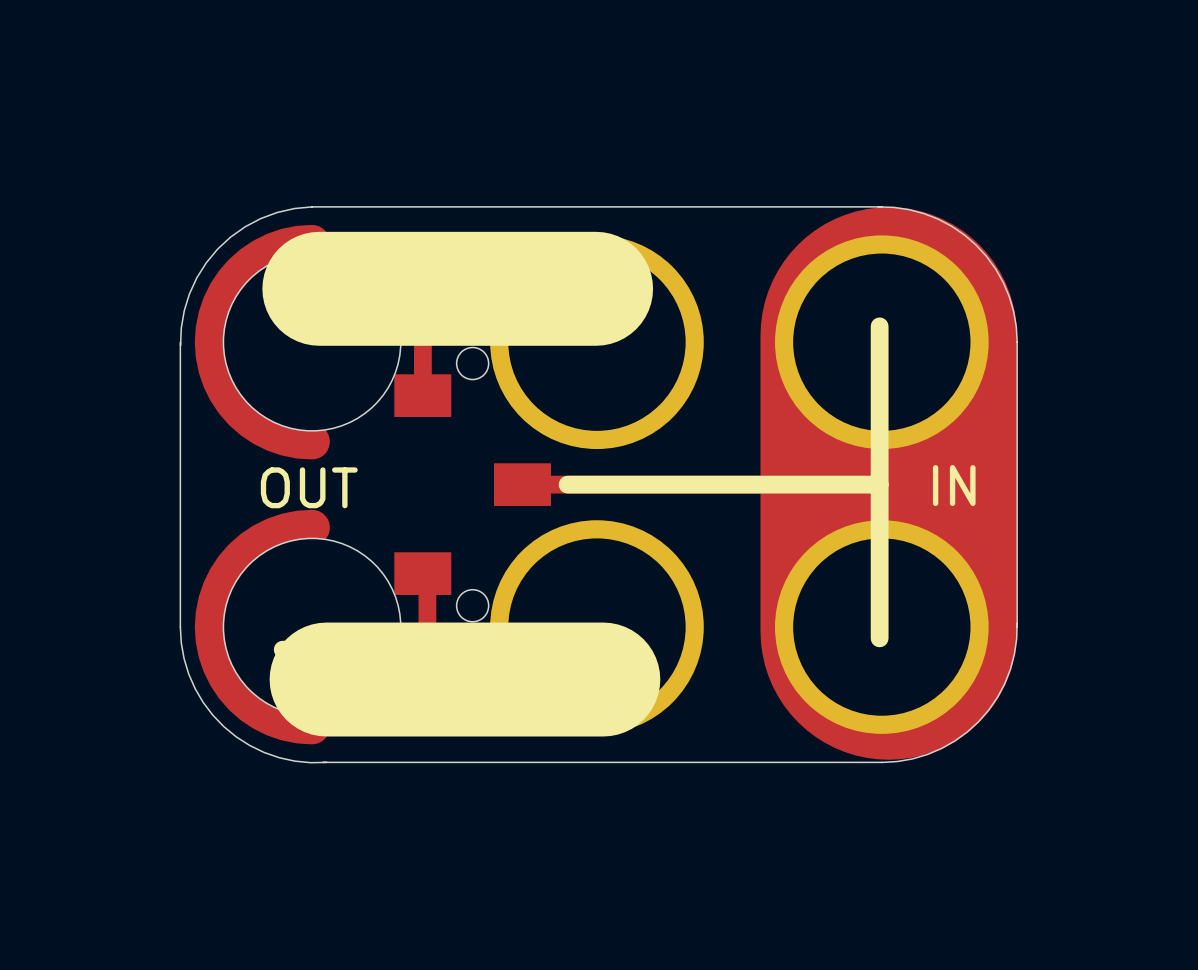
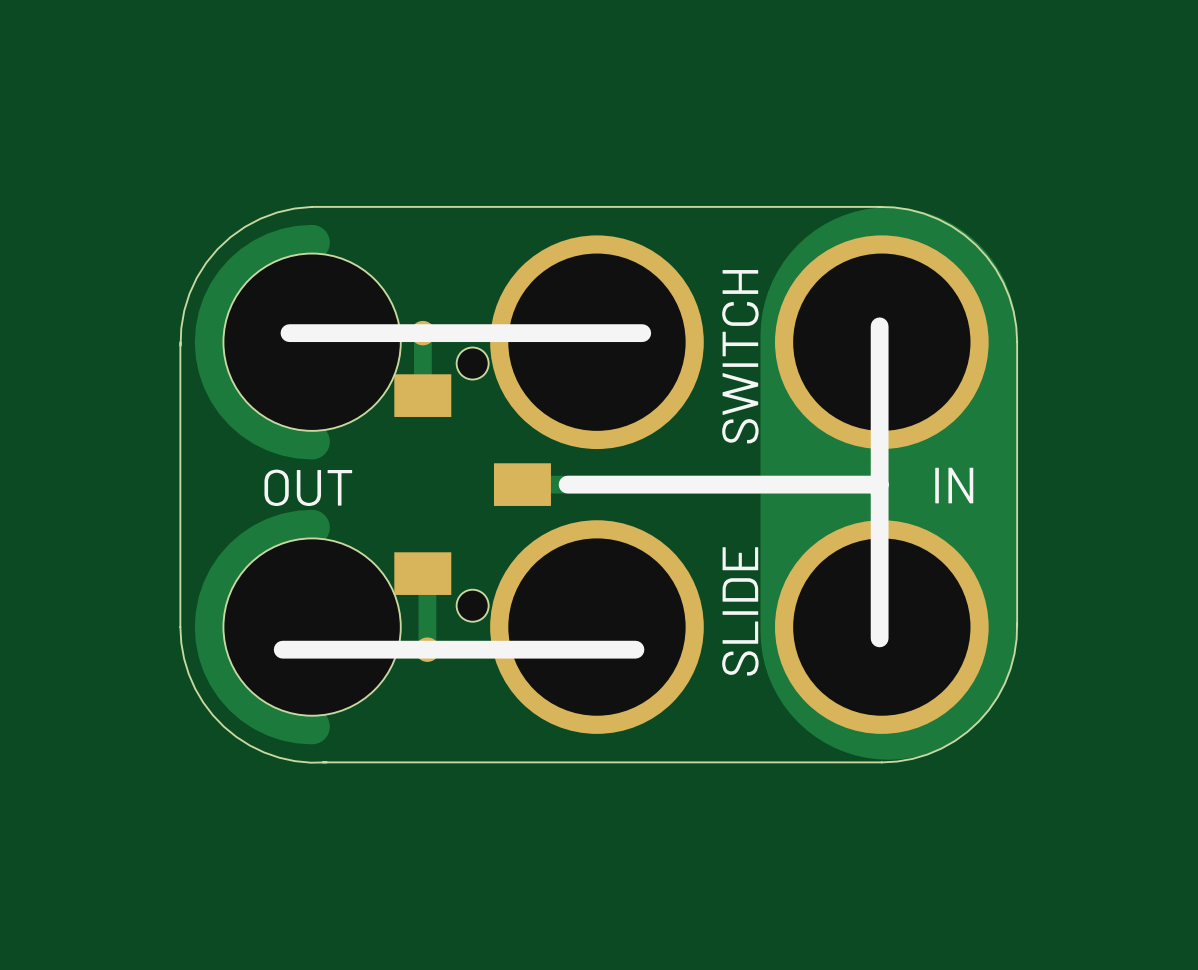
part footprint: [179, 206, 1018, 764] -> [179, 206, 1018, 764]

